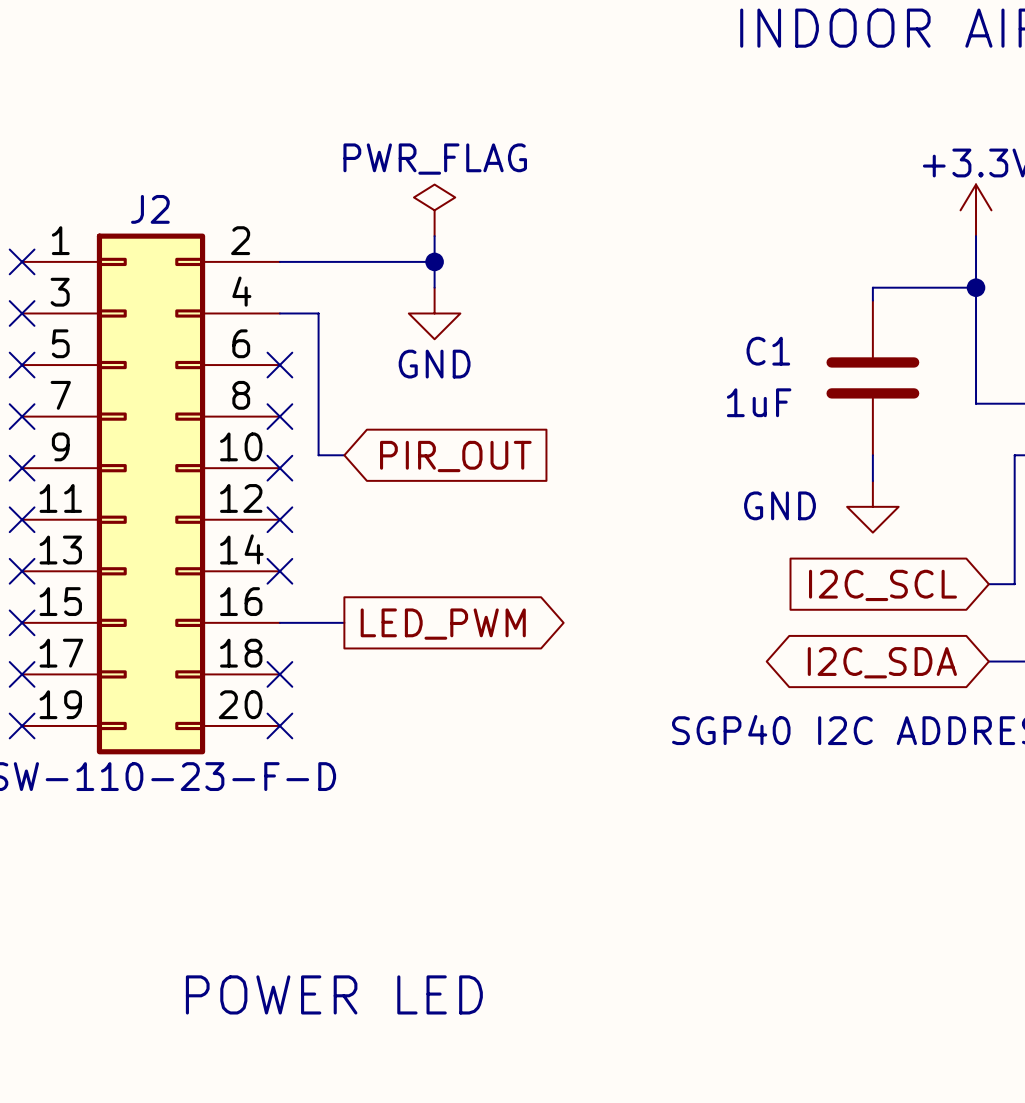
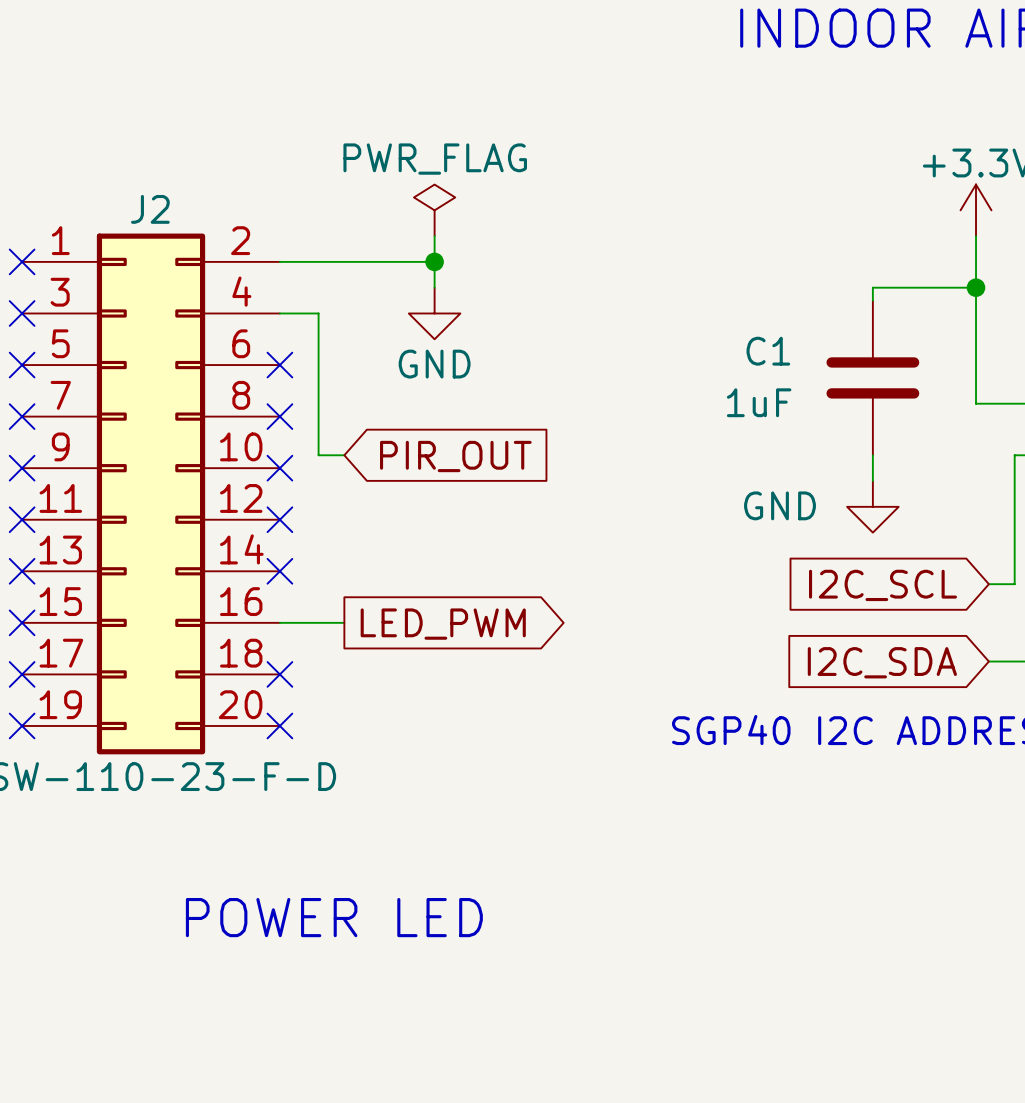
global label shape: bidirectional (882, 662) -> input (882, 662)
text position: POWER LED (334, 994) -> POWER LED (334, 917)

